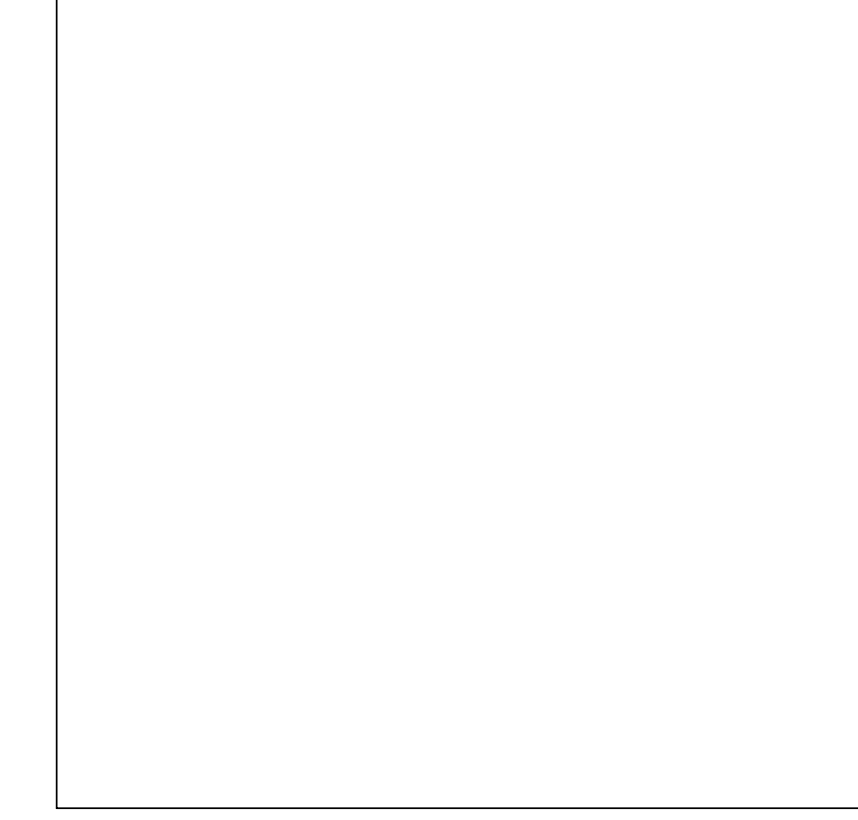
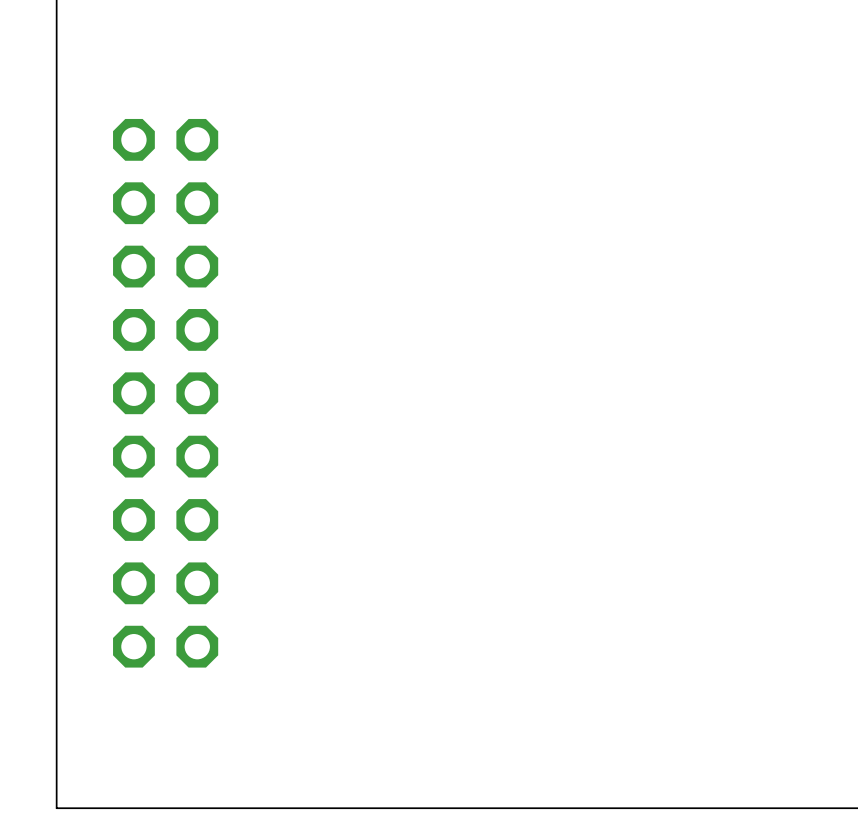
part: none -> (165, 393)

